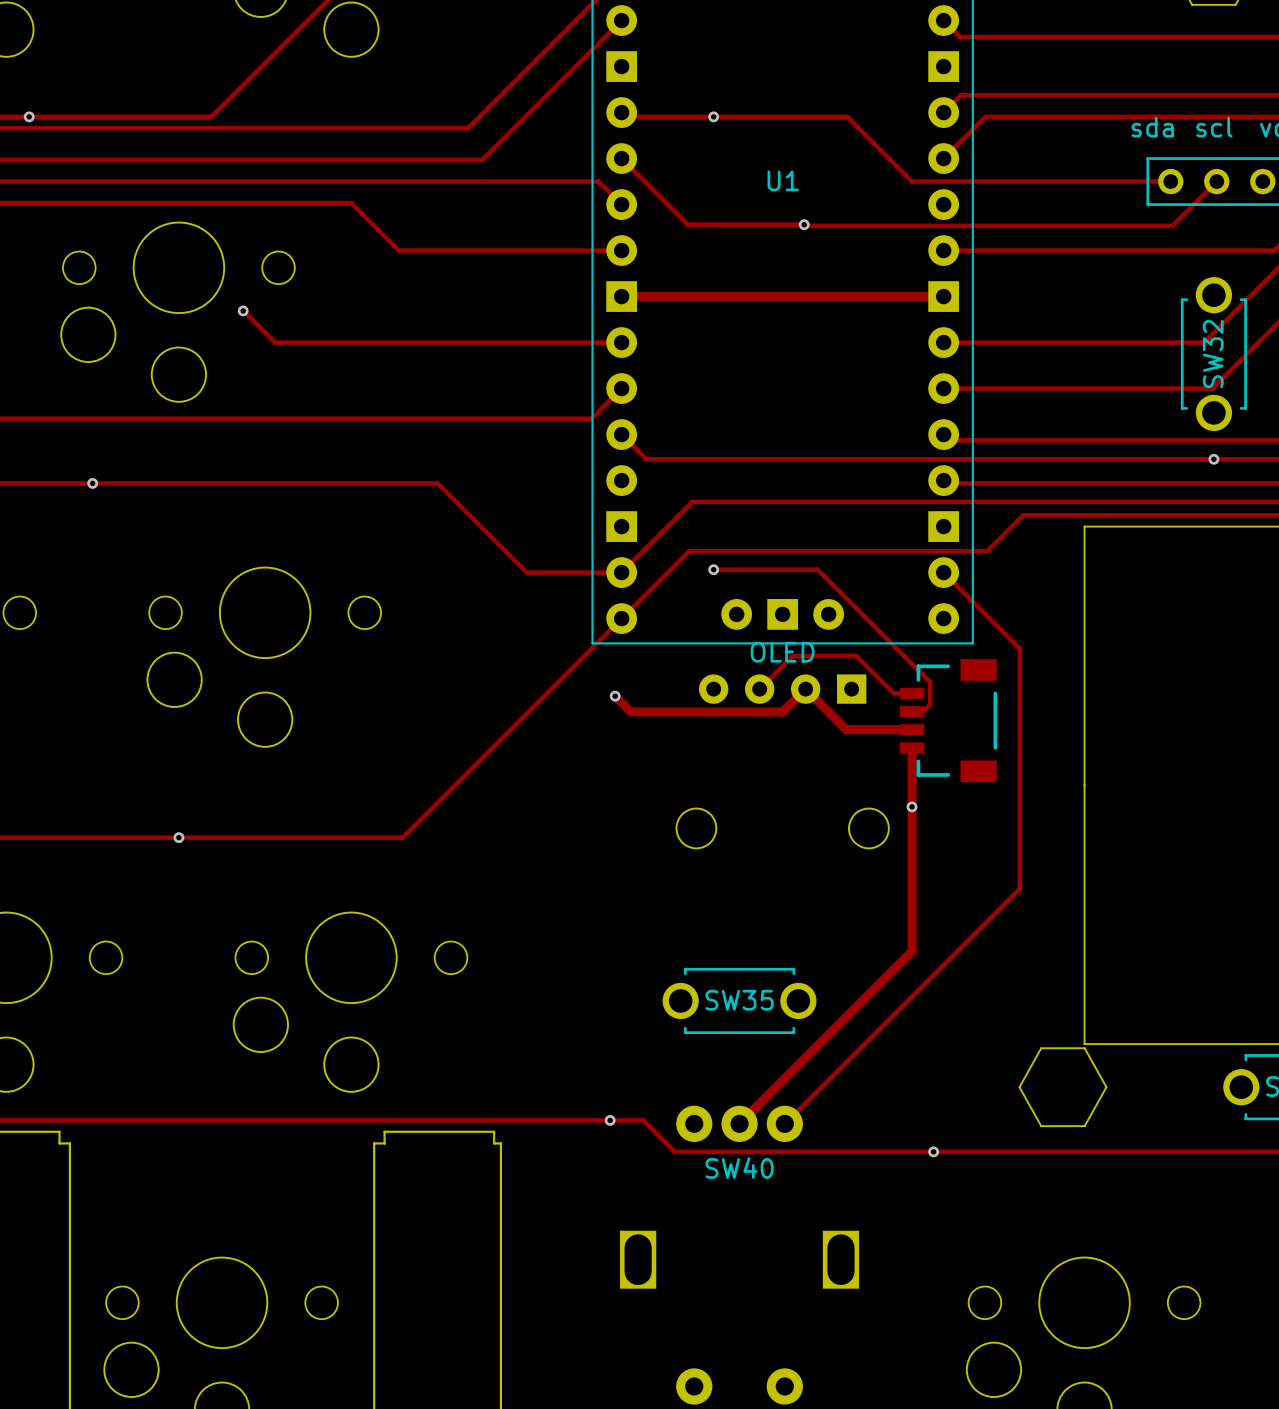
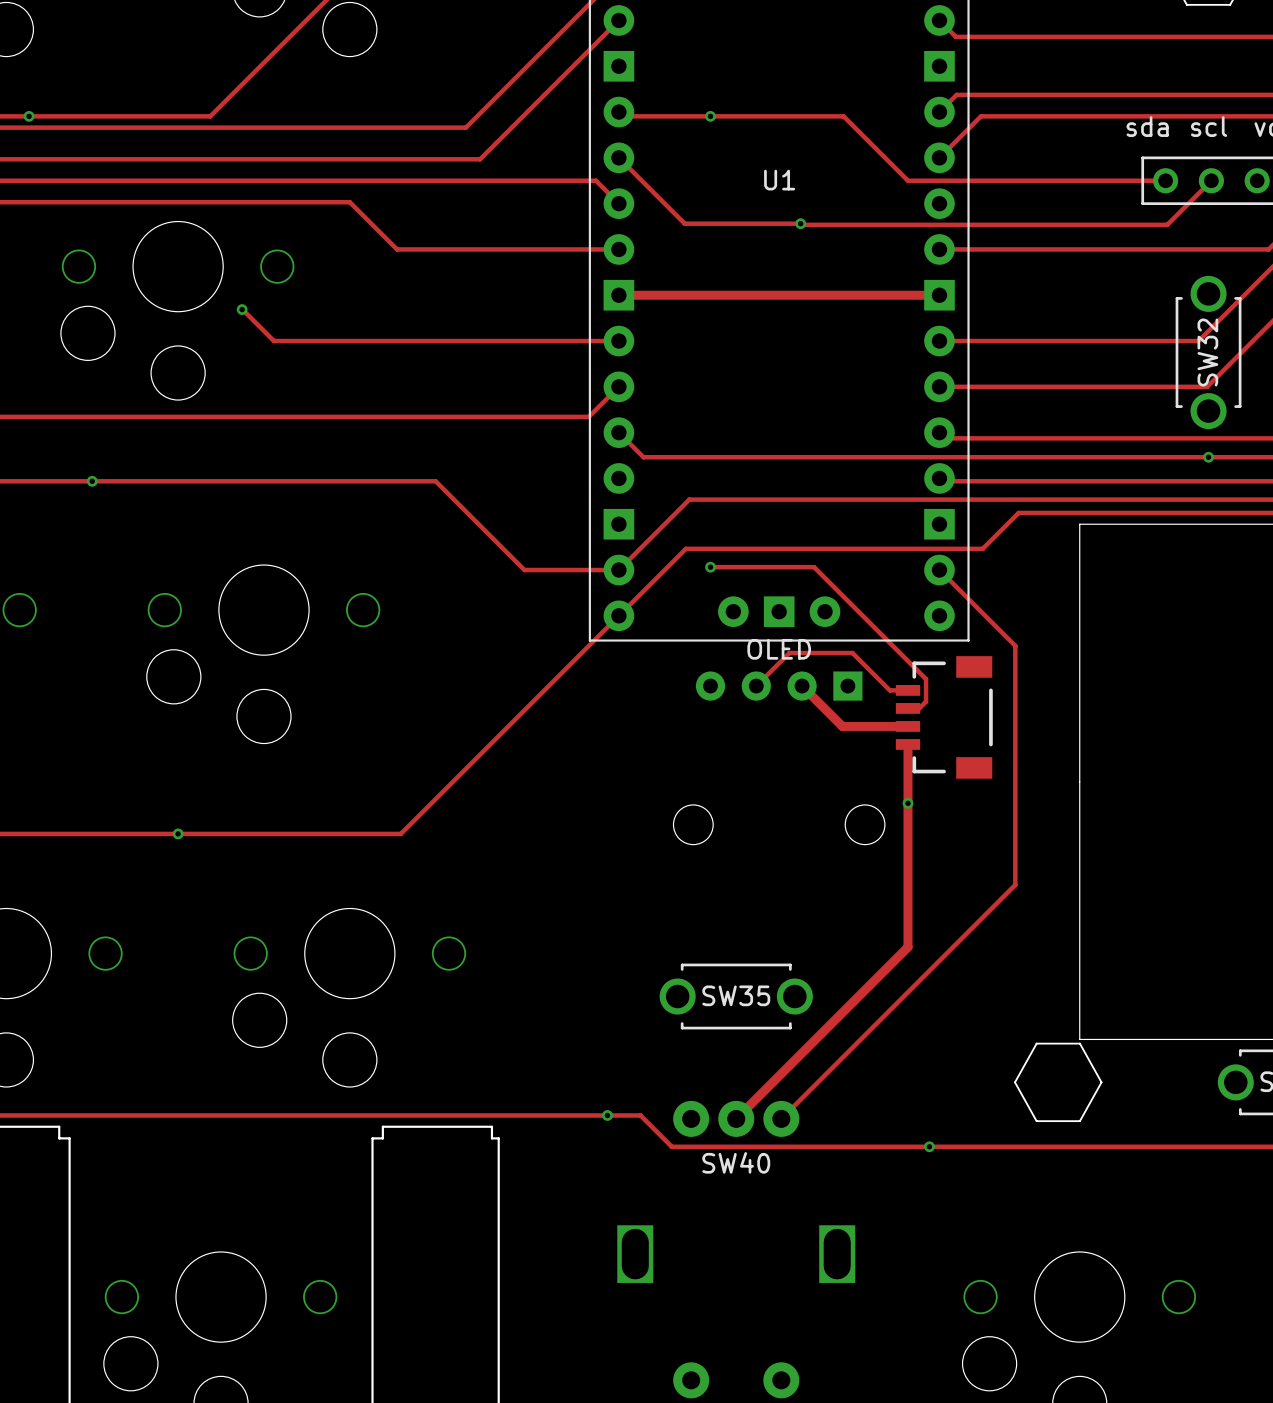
track: (805, 689) (782, 711) (630, 711) (615, 696) -> none
via: (615, 696) -> none

